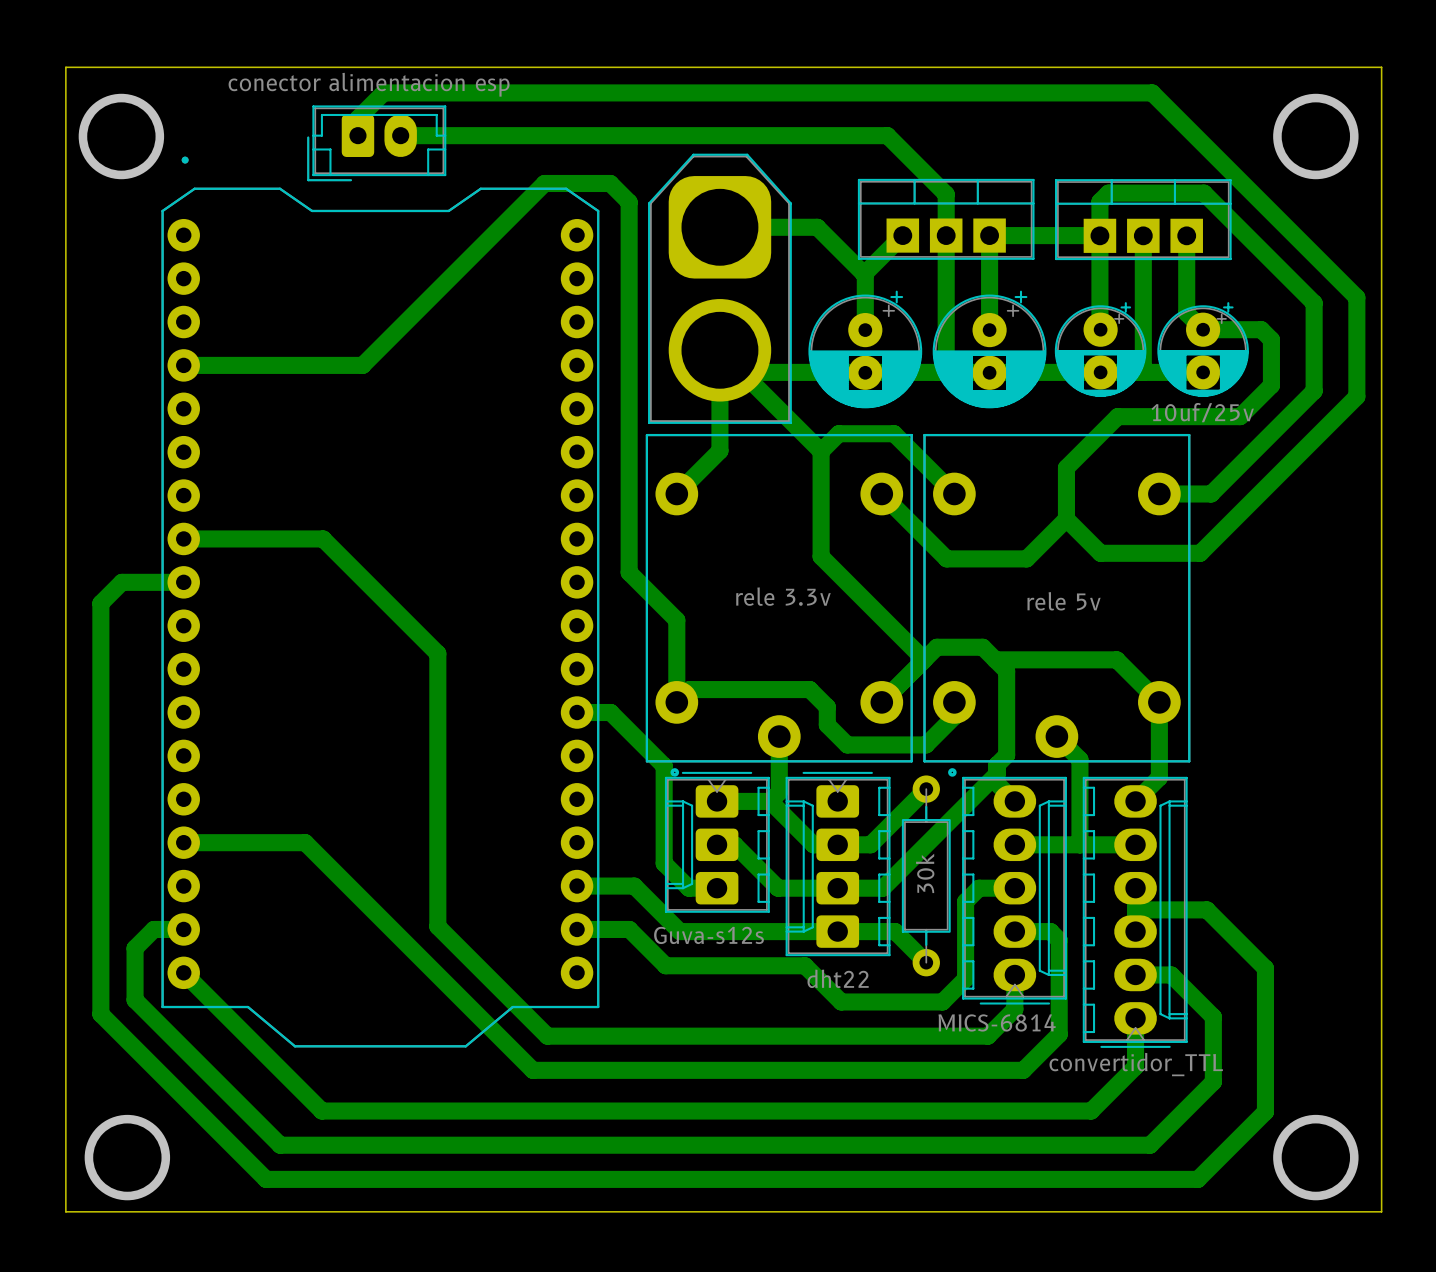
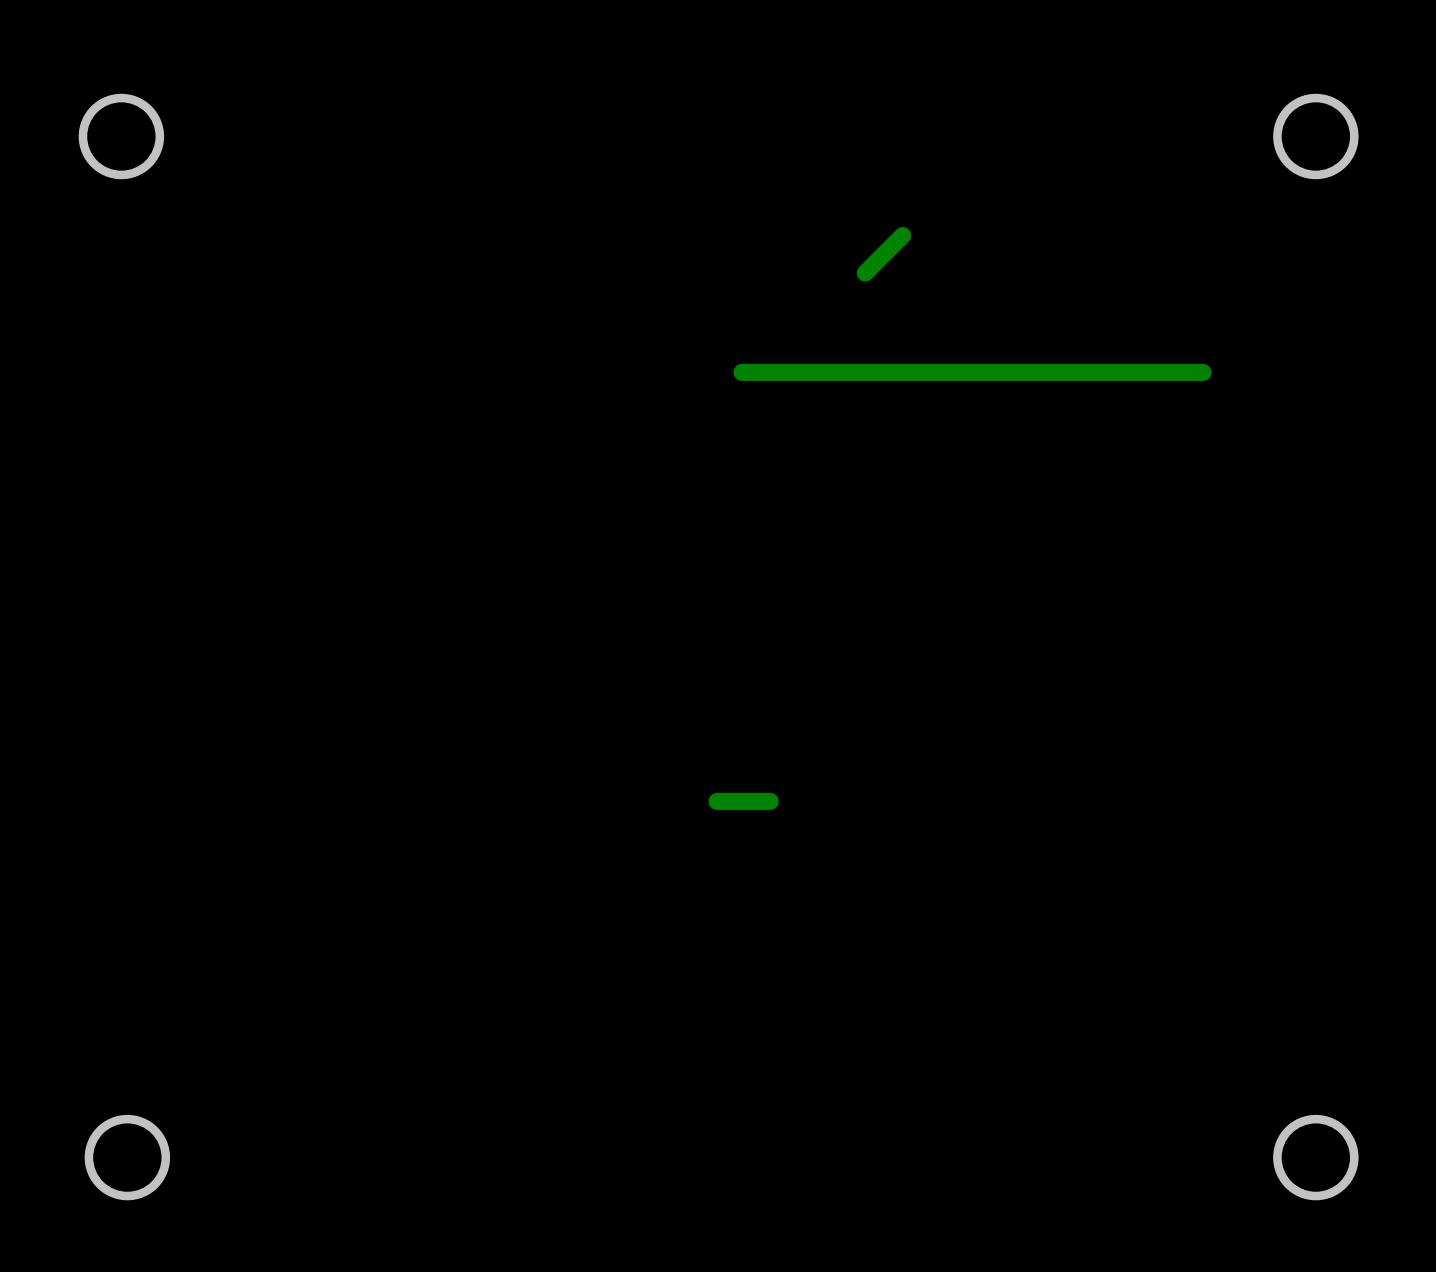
board edge: (65, 67) (1381, 67) (1381, 1211) (65, 1211) (65, 67) -> none
bottom track: (357, 135) (357, 118) (383, 92) (1152, 92) (1356, 297) (1356, 396) (1200, 553) (1100, 553) (1066, 519) -> none
bottom track: (400, 135) (887, 135) (946, 194) (946, 372) -> none
part: conector alimentacion esp (376, 143) -> none
part: (946, 219) -> none
part: (1143, 219) -> none
bottom track: (719, 227) (817, 227) (863, 273) (865, 273) (865, 330) -> none
bottom track: (1099, 235) (989, 235) (989, 330) -> none
bottom track: (1143, 235) (1143, 372) -> none
bottom track: (1186, 235) (1186, 313) (1203, 329) (1261, 329) (1271, 339) (1271, 385) (1240, 416) (1117, 416) (1066, 467) (1066, 519) -> none
part: (719, 288) -> none
bottom track: (1100, 329) (1099, 201) (1108, 193) (1204, 193) (1314, 303) (1314, 391) (1211, 493) (1159, 493) -> none
part: (865, 349) -> none
part: (989, 349) -> none
part: (1100, 349) -> none
part: 10uf/25v (1203, 349) -> none
bottom track: (183, 365) (362, 365) (544, 183) (610, 183) (629, 202) (629, 572) (676, 620) (676, 702) (689, 689) (809, 689) (827, 707) (827, 724) (847, 744) (926, 744) (954, 716) (954, 702) -> none
bottom track: (821, 451) (719, 350) (719, 450) (676, 493) -> none
bottom track: (821, 451) (838, 433) (894, 433) (954, 493) -> none
bottom track: (821, 451) (821, 556) (924, 659) -> none
bottom track: (881, 493) (946, 558) (1026, 558) (1066, 519) -> none
bottom track: (183, 538) (323, 538) (437, 653) (437, 926) (547, 1036) (988, 1036) (1014, 1009) (1014, 974) -> none
bottom track: (183, 582) (121, 582) (100, 603) (100, 1014) (266, 1179) (1197, 1179) (1265, 1111) (1265, 968) (1206, 909) (1135, 909) -> none
part: (380, 602) -> none
part: rele 3.3v (779, 605) -> none
part: rele 5v (1056, 605) -> none
bottom track: (995, 659) (1116, 659) (1159, 702) (1159, 777) (1135, 801) -> none
bottom track: (881, 702) (936, 647) (982, 647) (1006, 671) (1006, 755) (996, 764) (996, 783) (1014, 801) -> none
bottom track: (577, 712) (610, 712) (664, 765) (664, 863) (688, 888) (717, 888) -> none
bottom track: (779, 736) (779, 792) (770, 801) (813, 844) (870, 844) (926, 789) -> none
bottom track: (1056, 736) (1079, 759) (1079, 844) -> none
bottom track: (996, 774) (882, 888) (778, 888) (734, 844) (717, 844) -> none
bottom track: (183, 842) (305, 842) (532, 1070) (1023, 1070) (1059, 1034) (1059, 940) (1050, 931) (1014, 931) -> none
part: Guva-s12s (717, 842) -> none
bottom track: (1014, 844) (1135, 844) -> none
part: dht22 (838, 864) -> none
part: 30k (926, 875) -> none
bottom track: (577, 886) (634, 886) (679, 931) (895, 931) (926, 962) -> none
bottom track: (1014, 888) (979, 888) (965, 901) (965, 978) (942, 1001) (841, 1001) (805, 965) (665, 965) (629, 929) (577, 929) (579, 931) -> none
part: MICS-6814 (1014, 890) -> none
part: convertidor_TTL (1135, 912) -> none
bottom track: (183, 929) (153, 929) (135, 948) (135, 1000) (280, 1145) (1150, 1145) (1213, 1082) (1213, 1017) (1171, 974) (1135, 974) -> none
bottom track: (183, 972) (321, 1111) (1091, 1111) (1135, 1066) (1135, 1018) -> none

